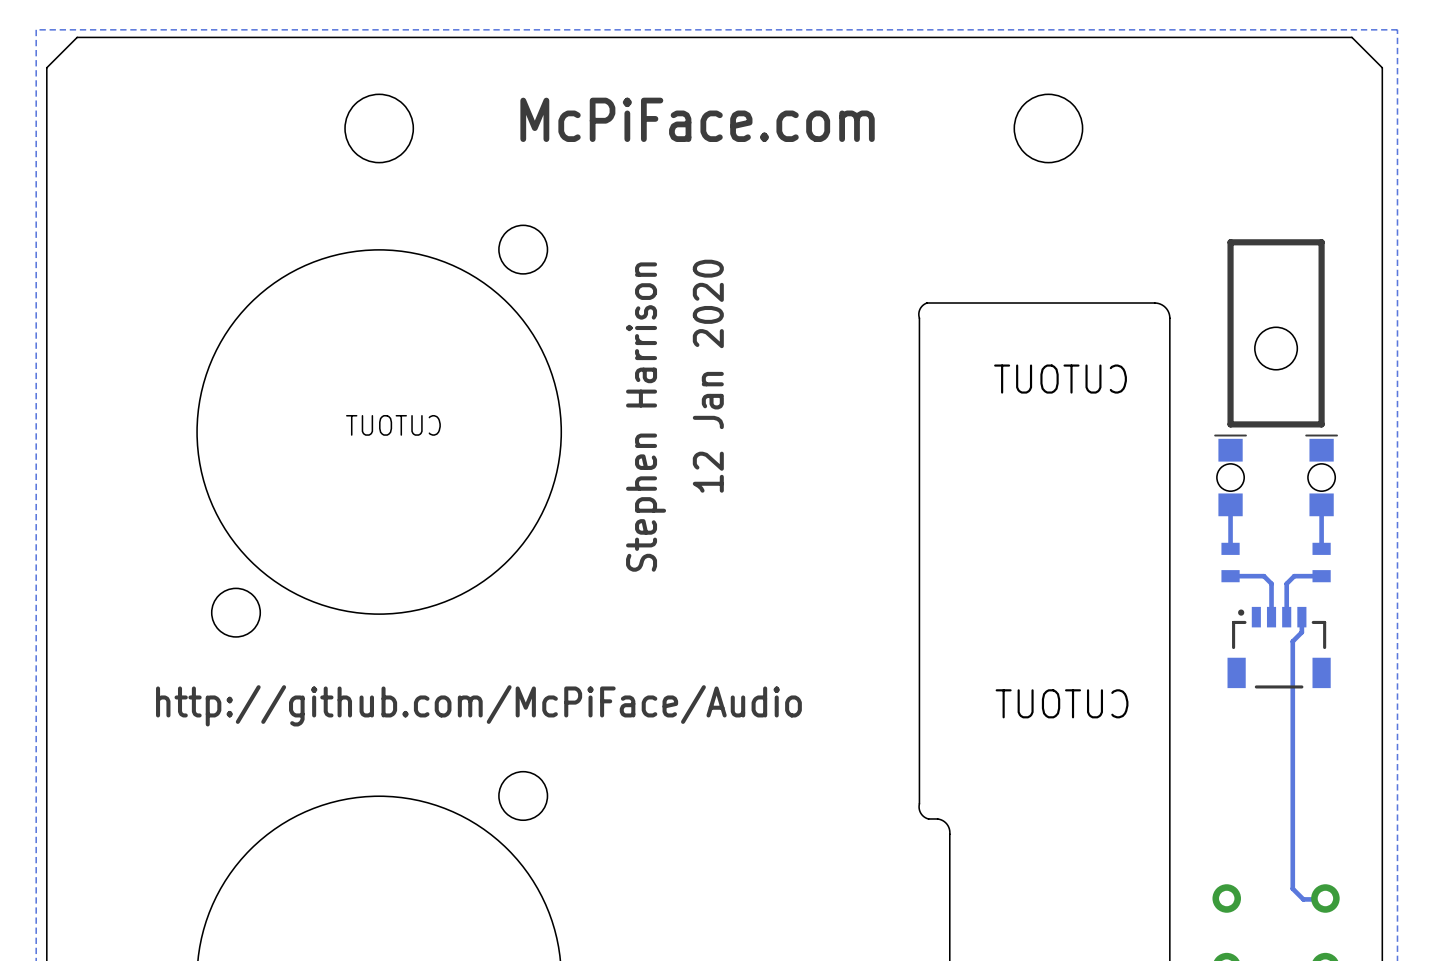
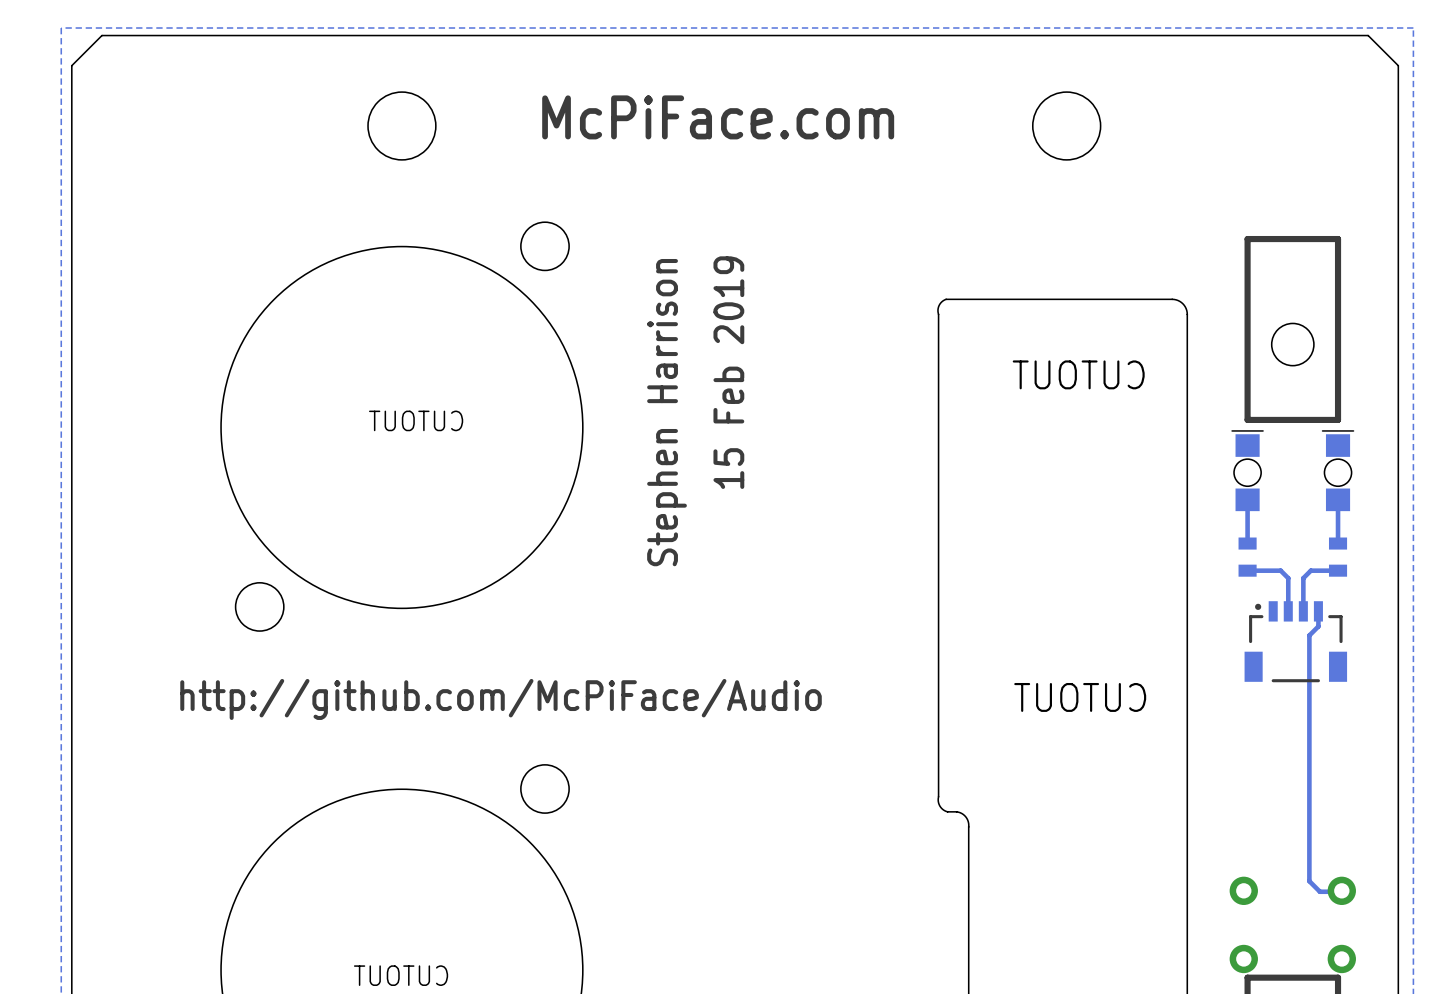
text: 12 Jan 2020 (708, 376) -> 15 Feb 2019 (728, 372)

